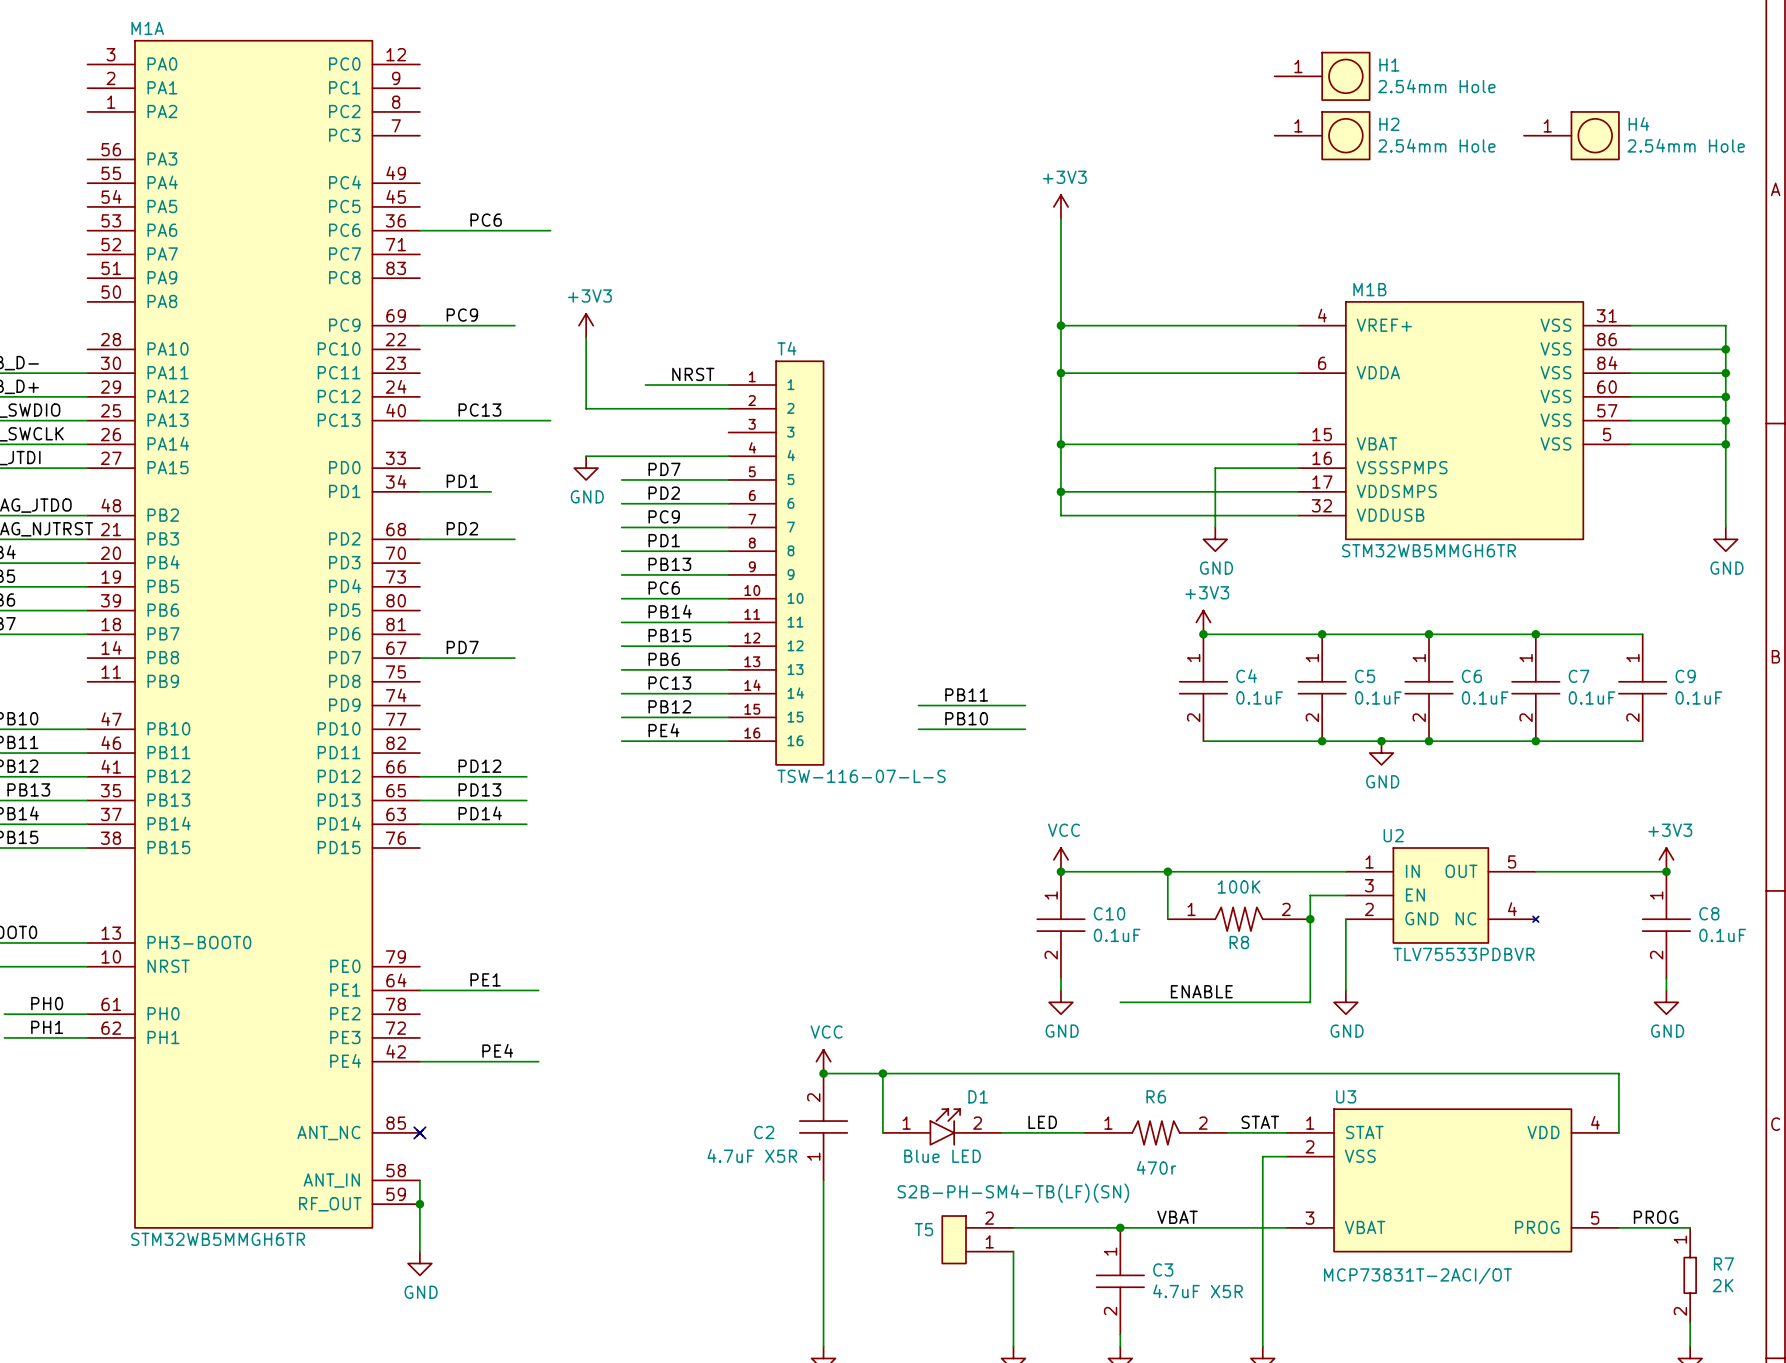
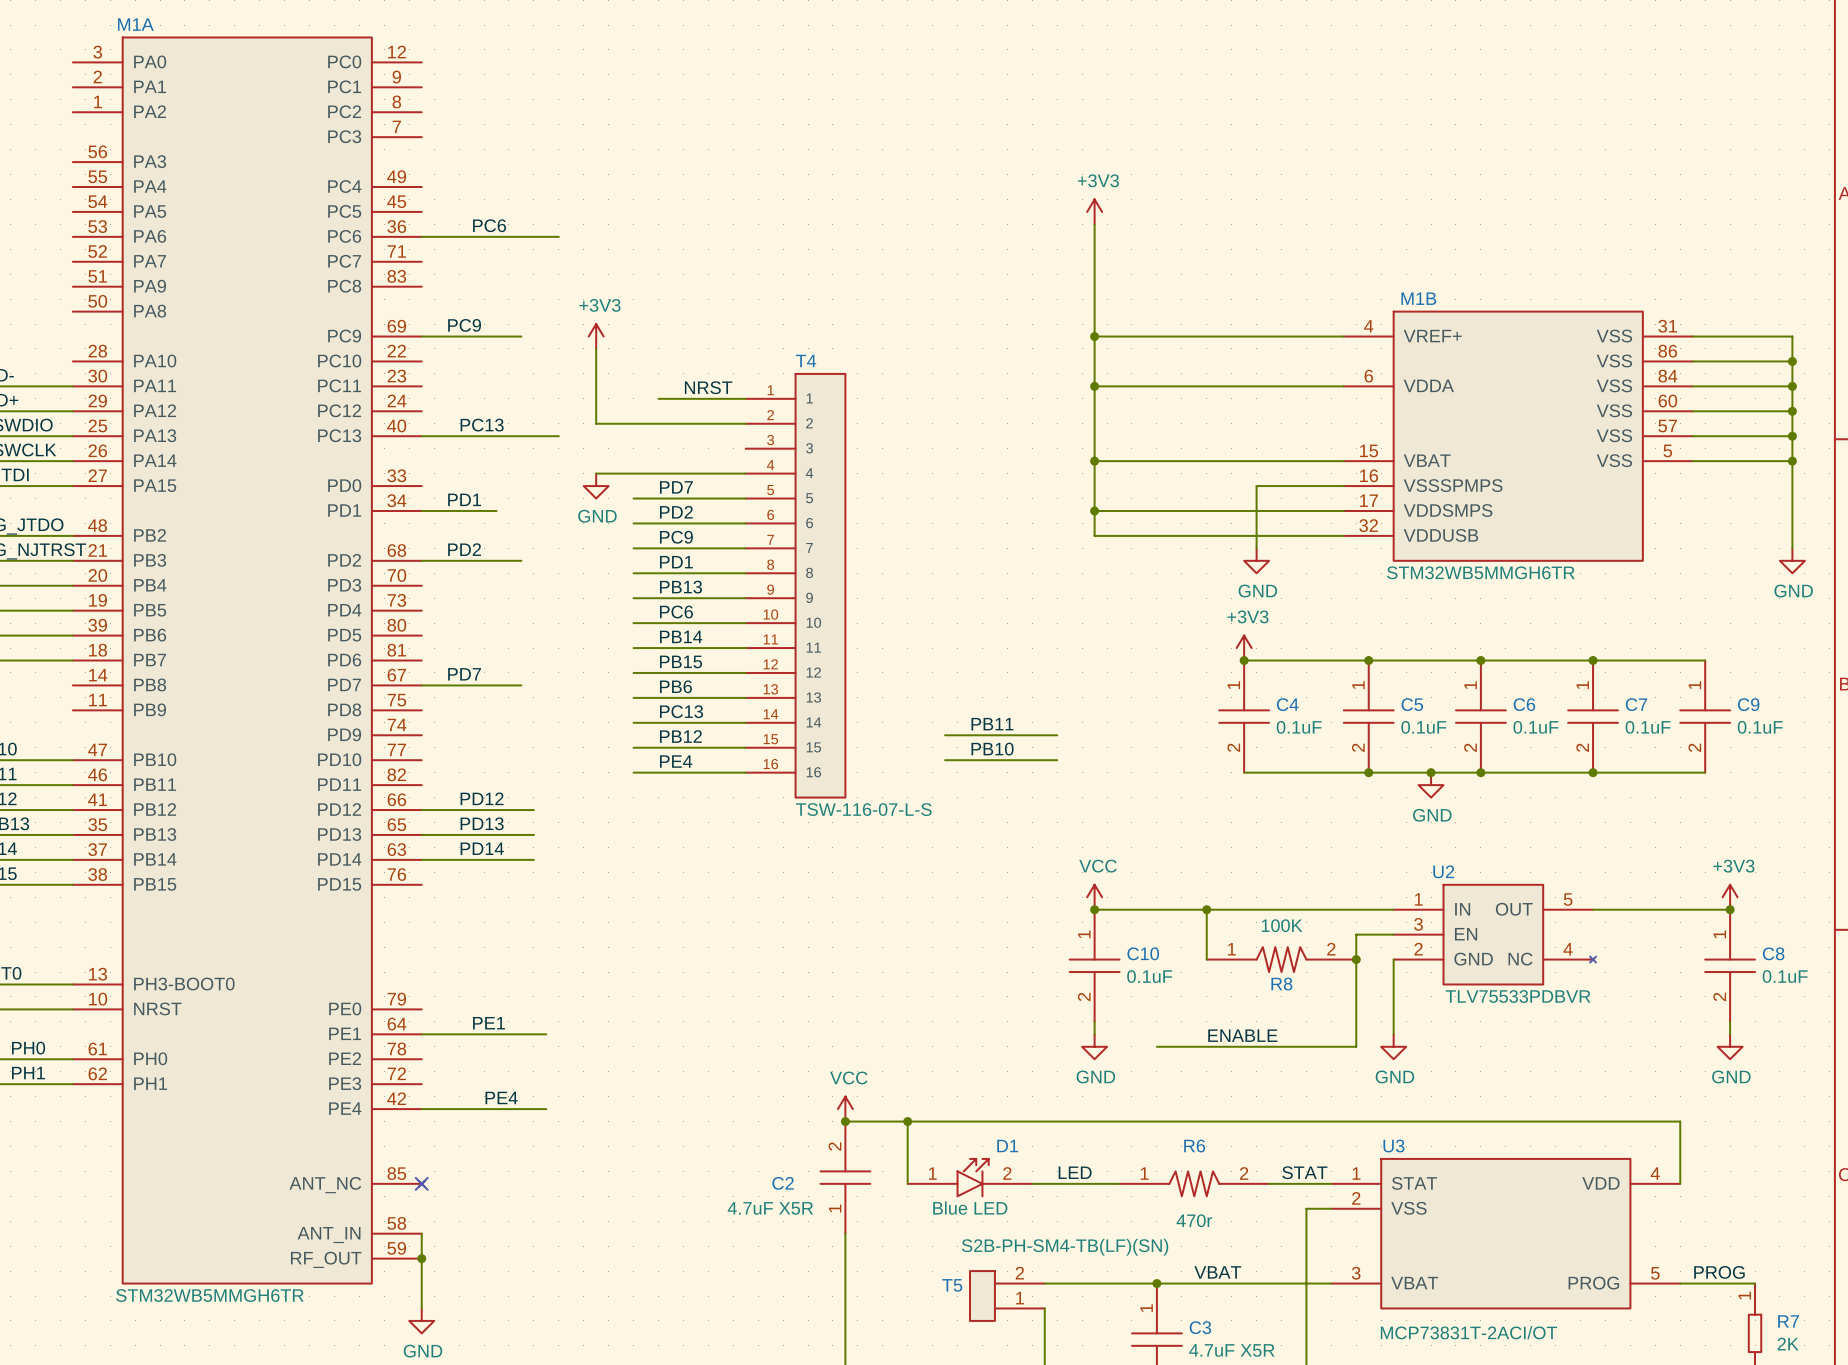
H1: (1322, 76) -> none
H2: (1322, 135) -> none
H4: (1571, 135) -> none

